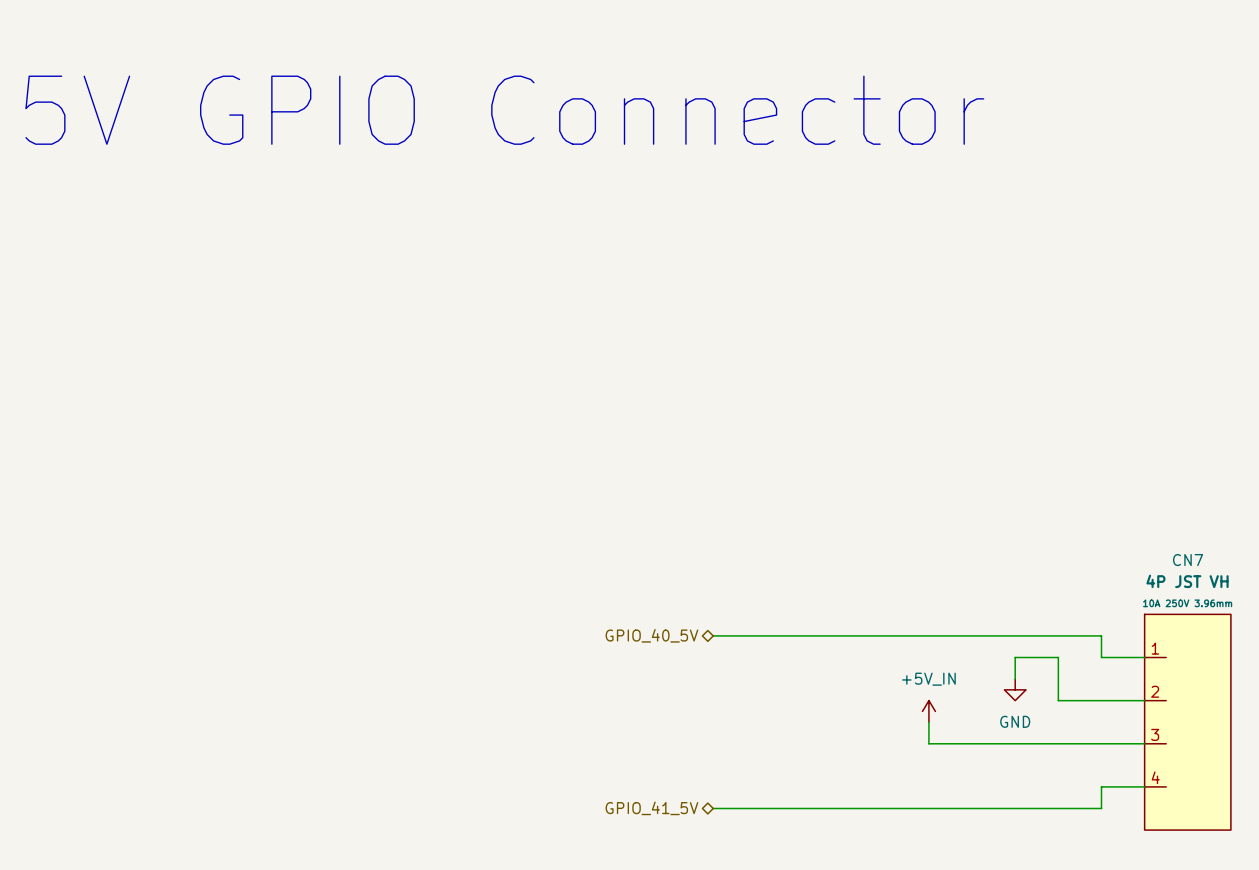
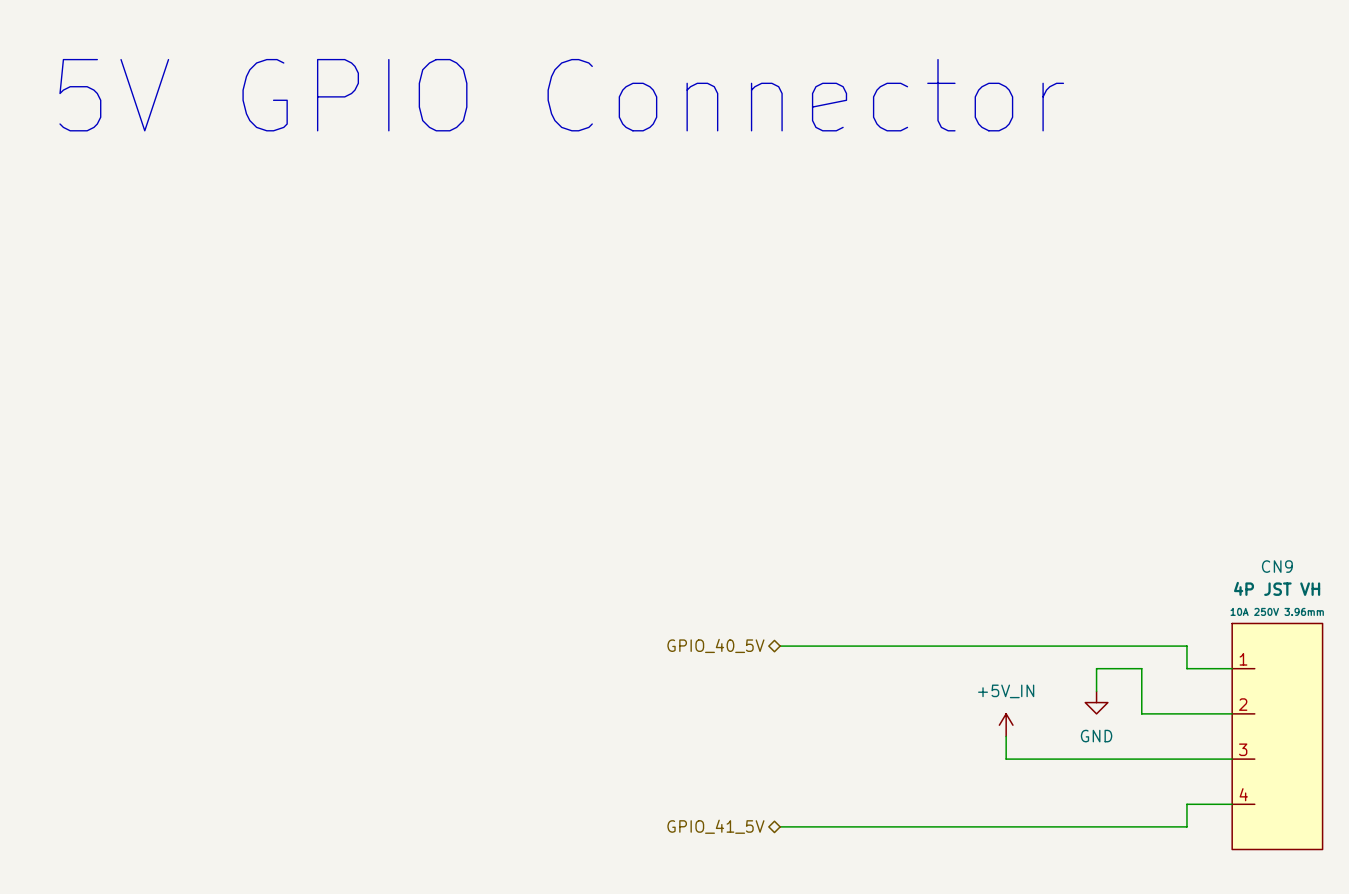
CN7 name: CN7 (1188, 560) -> CN9 (1277, 566)

